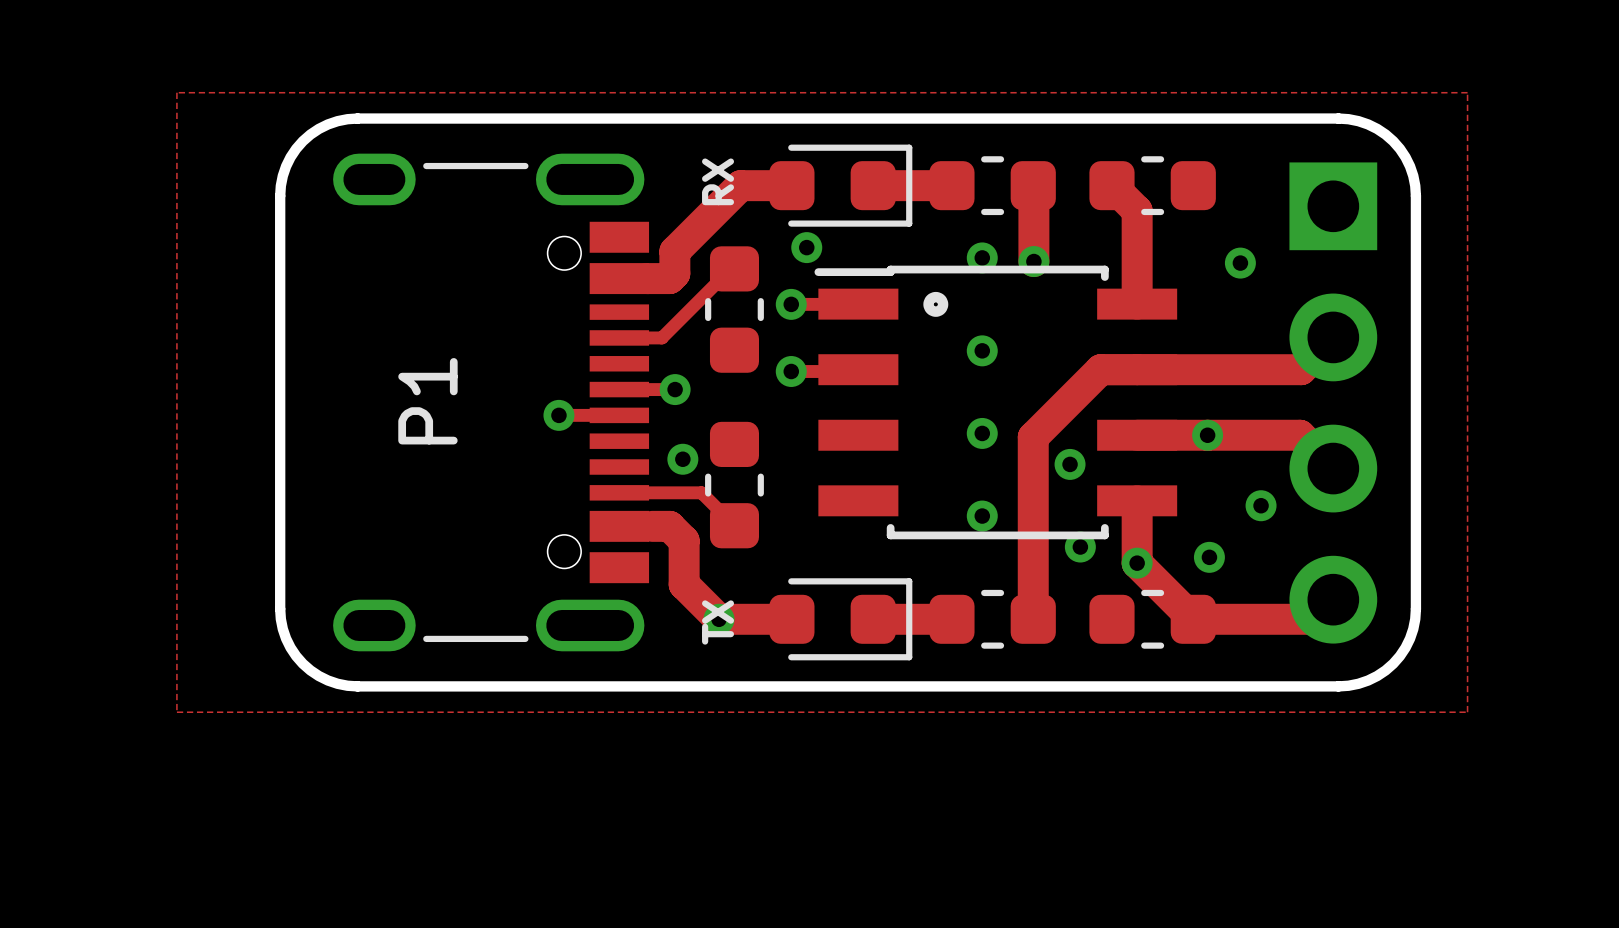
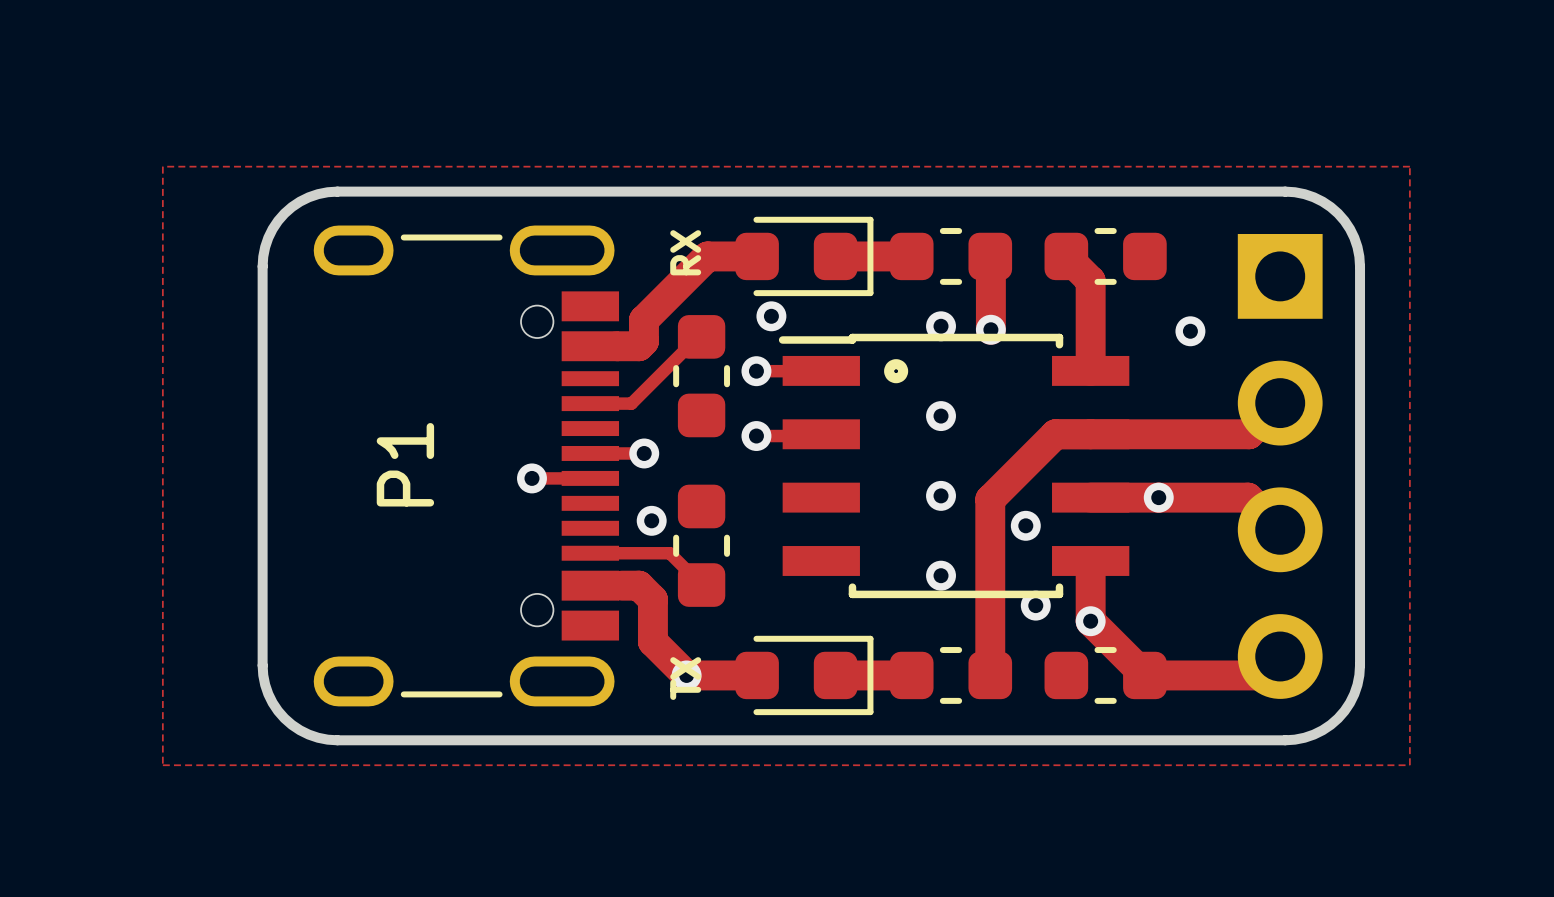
via: (1261, 505) -> none
via: (1209, 557) -> none

